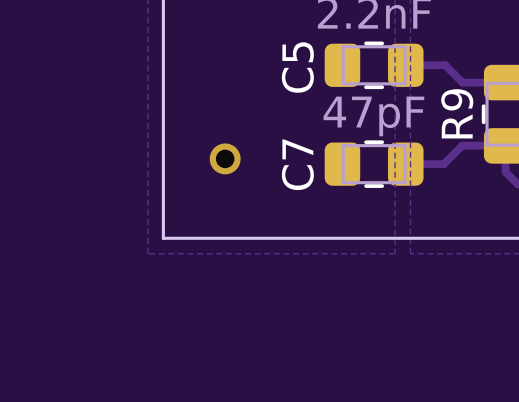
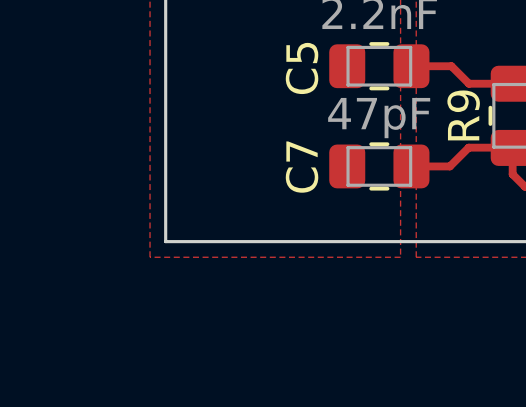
via: (225, 158) -> none

